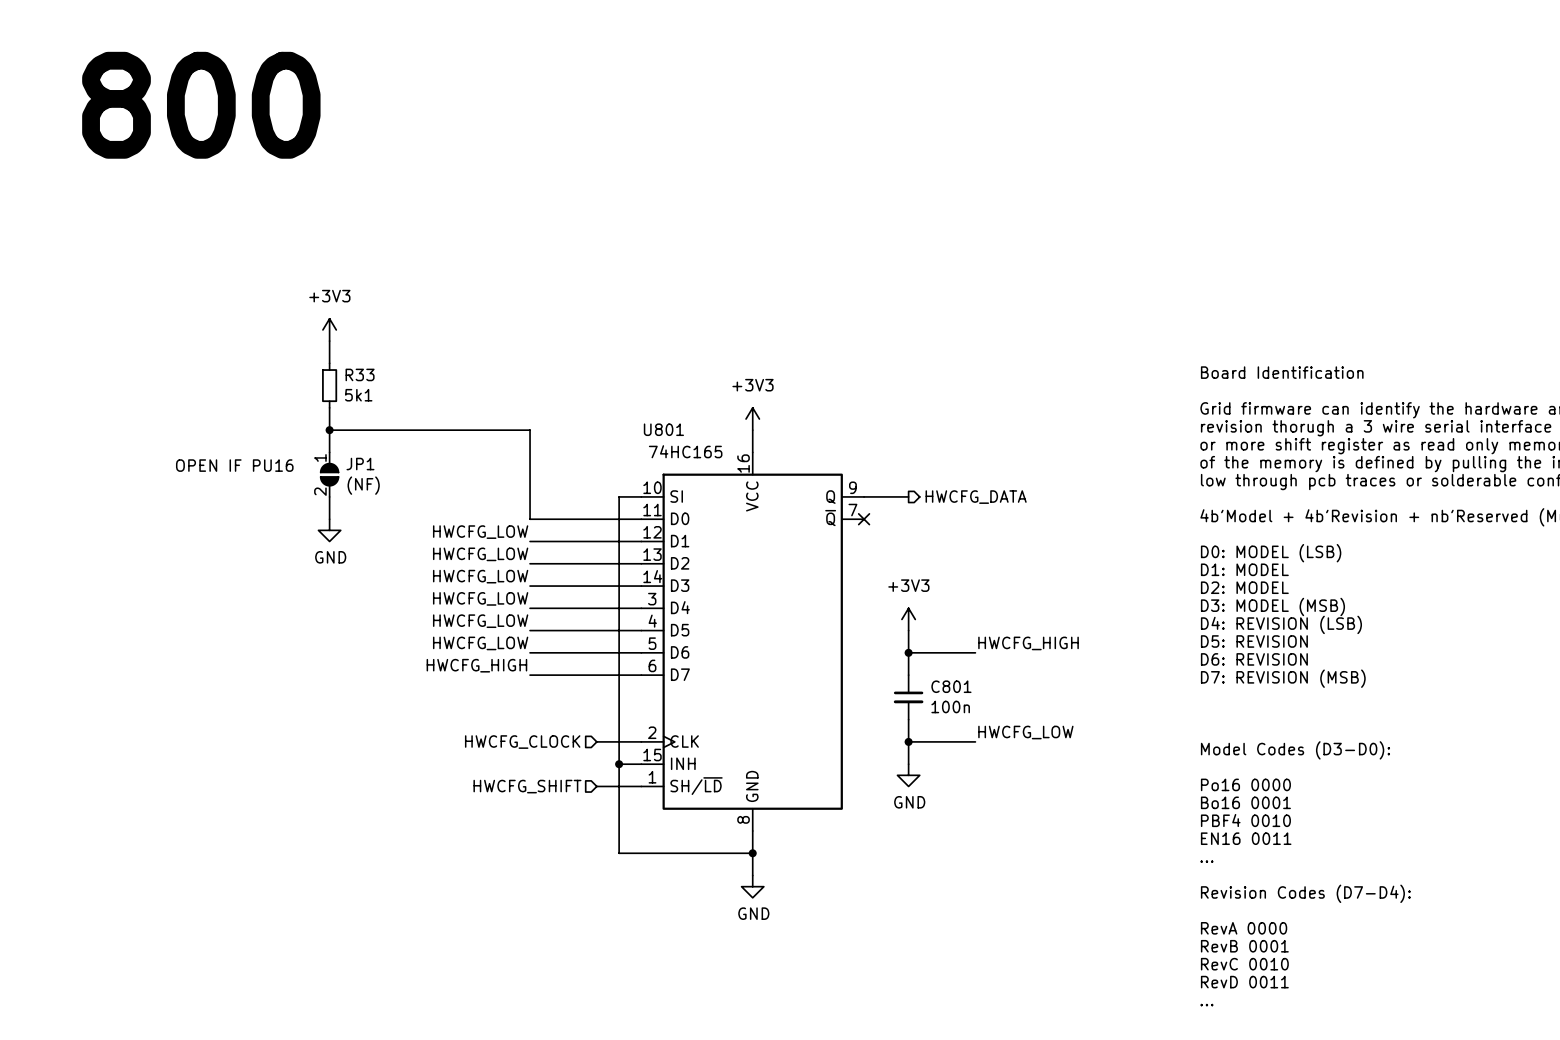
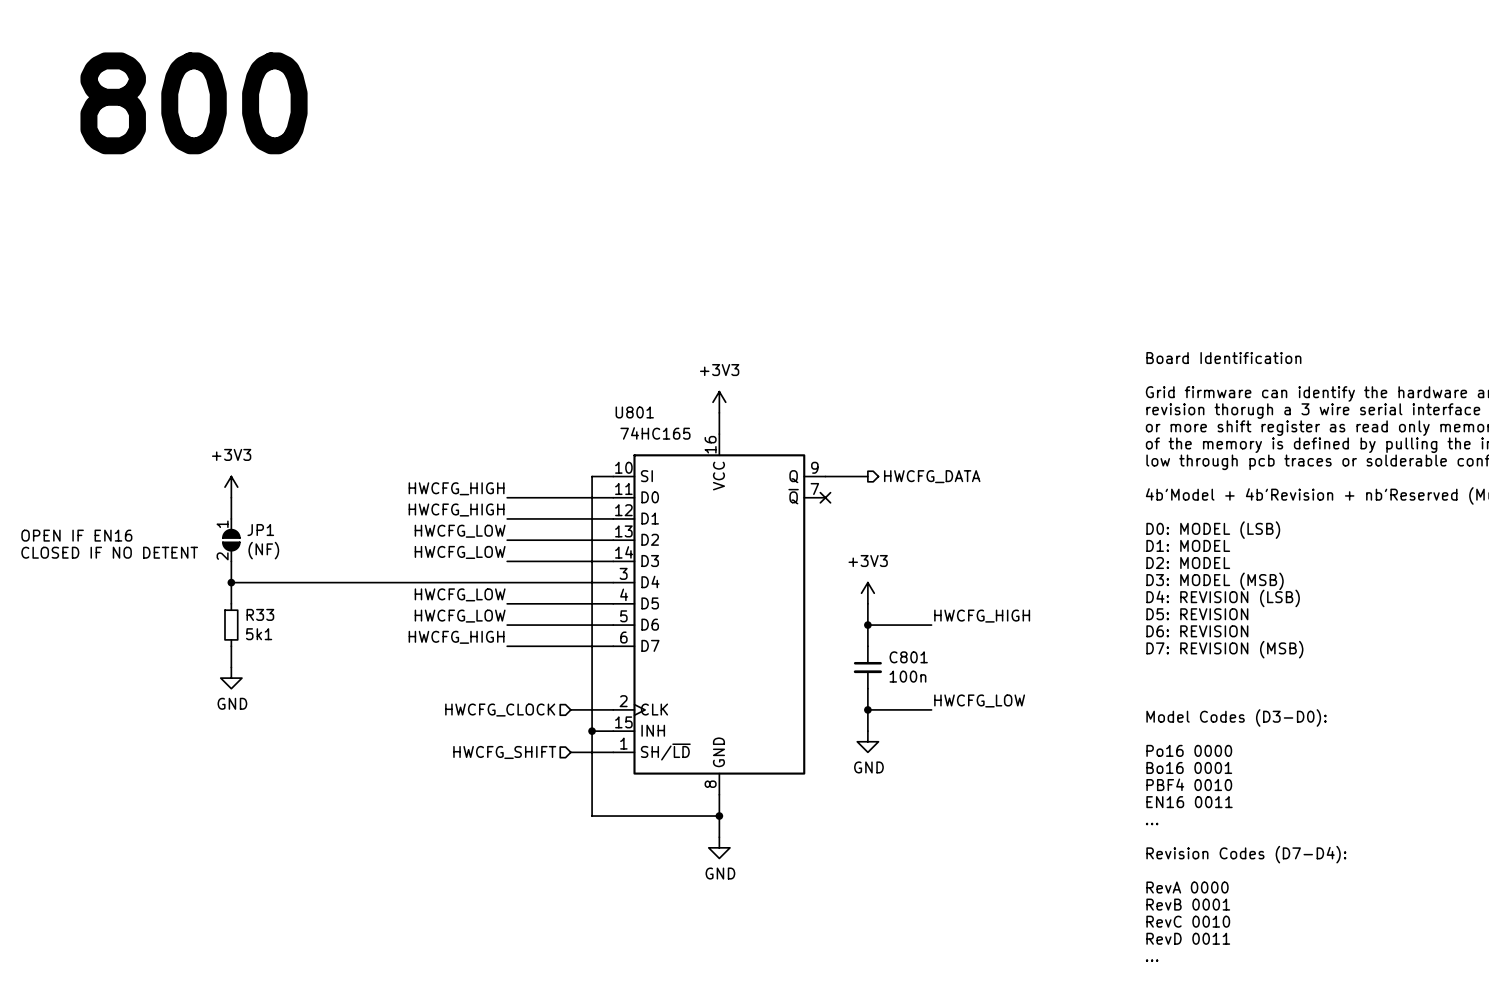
power symbol position: +3V3 (329, 329) -> +3V3 (231, 487)
wire: (329, 341) (329, 363) -> (231, 497) (231, 518)
R33 position: (329, 385) -> (231, 625)
wire: (329, 407) (329, 452) -> (231, 561) (231, 603)
wire: (329, 430) (530, 430) (530, 519) -> none
junction: (329, 430) -> none
text: OPEN IF PU16 (234, 465) -> none
JP1 position: (329, 474) -> (231, 540)
wire: (329, 496) (329, 519) -> (231, 646) (231, 667)
label: none -> HWCFG_HIGH (456, 488)
power symbol position: GND (329, 530) -> GND (231, 678)
label: HWCFG_LOW (480, 532) -> HWCFG_HIGH (456, 510)
text: none -> OPEN IF EN16 (76, 535)
text: none -> CLOSED IF NO DETENT (109, 552)
label: HWCFG_LOW (480, 598) -> none
wire: none -> (231, 582) (507, 582)
junction: none -> (231, 582)

